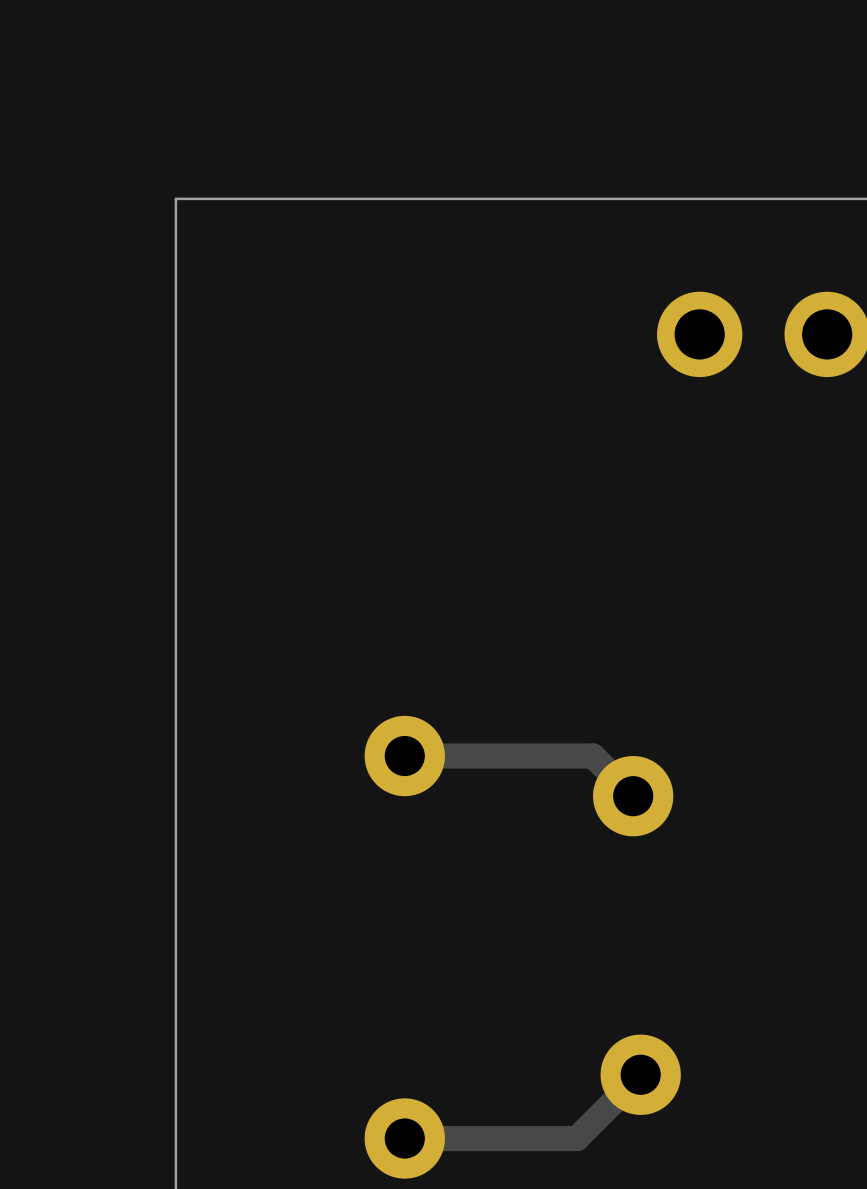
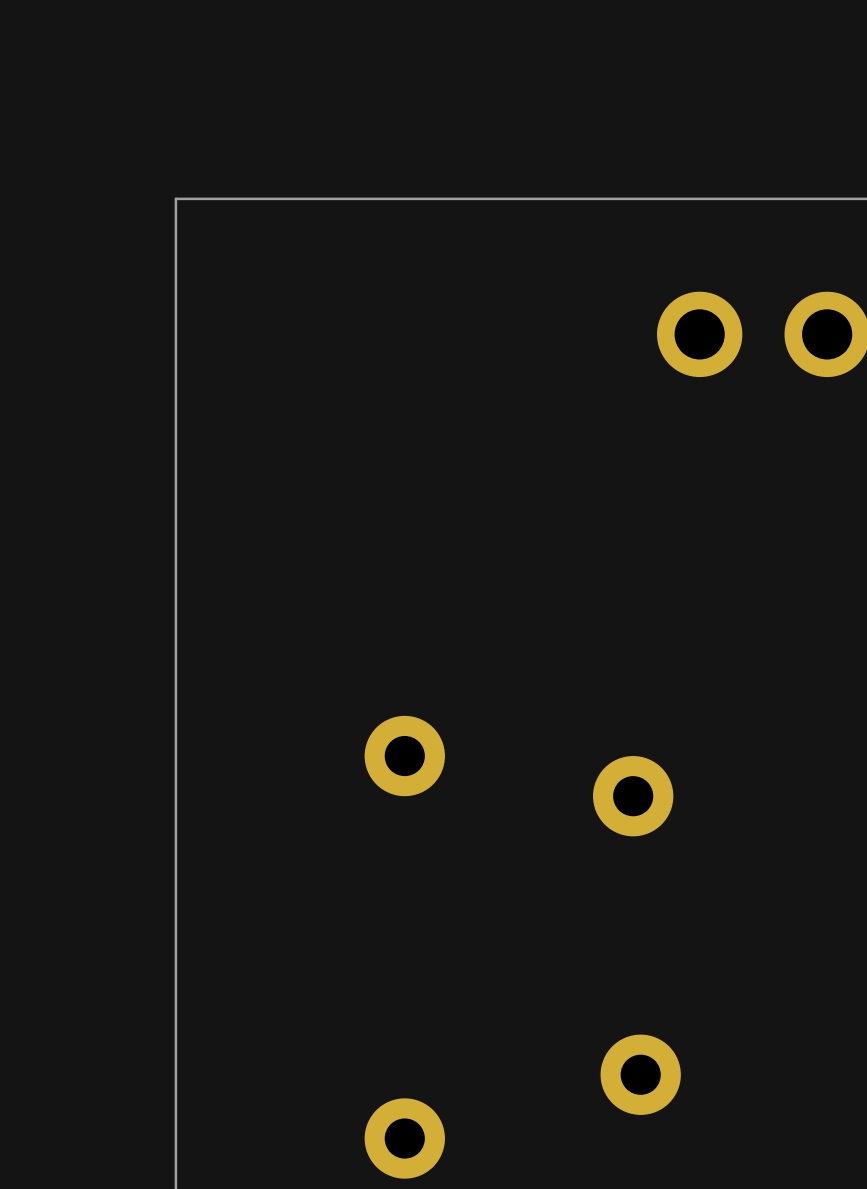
track: (404, 756) (593, 756) (633, 796) -> none
track: (640, 1074) (576, 1138) (404, 1138) -> none

